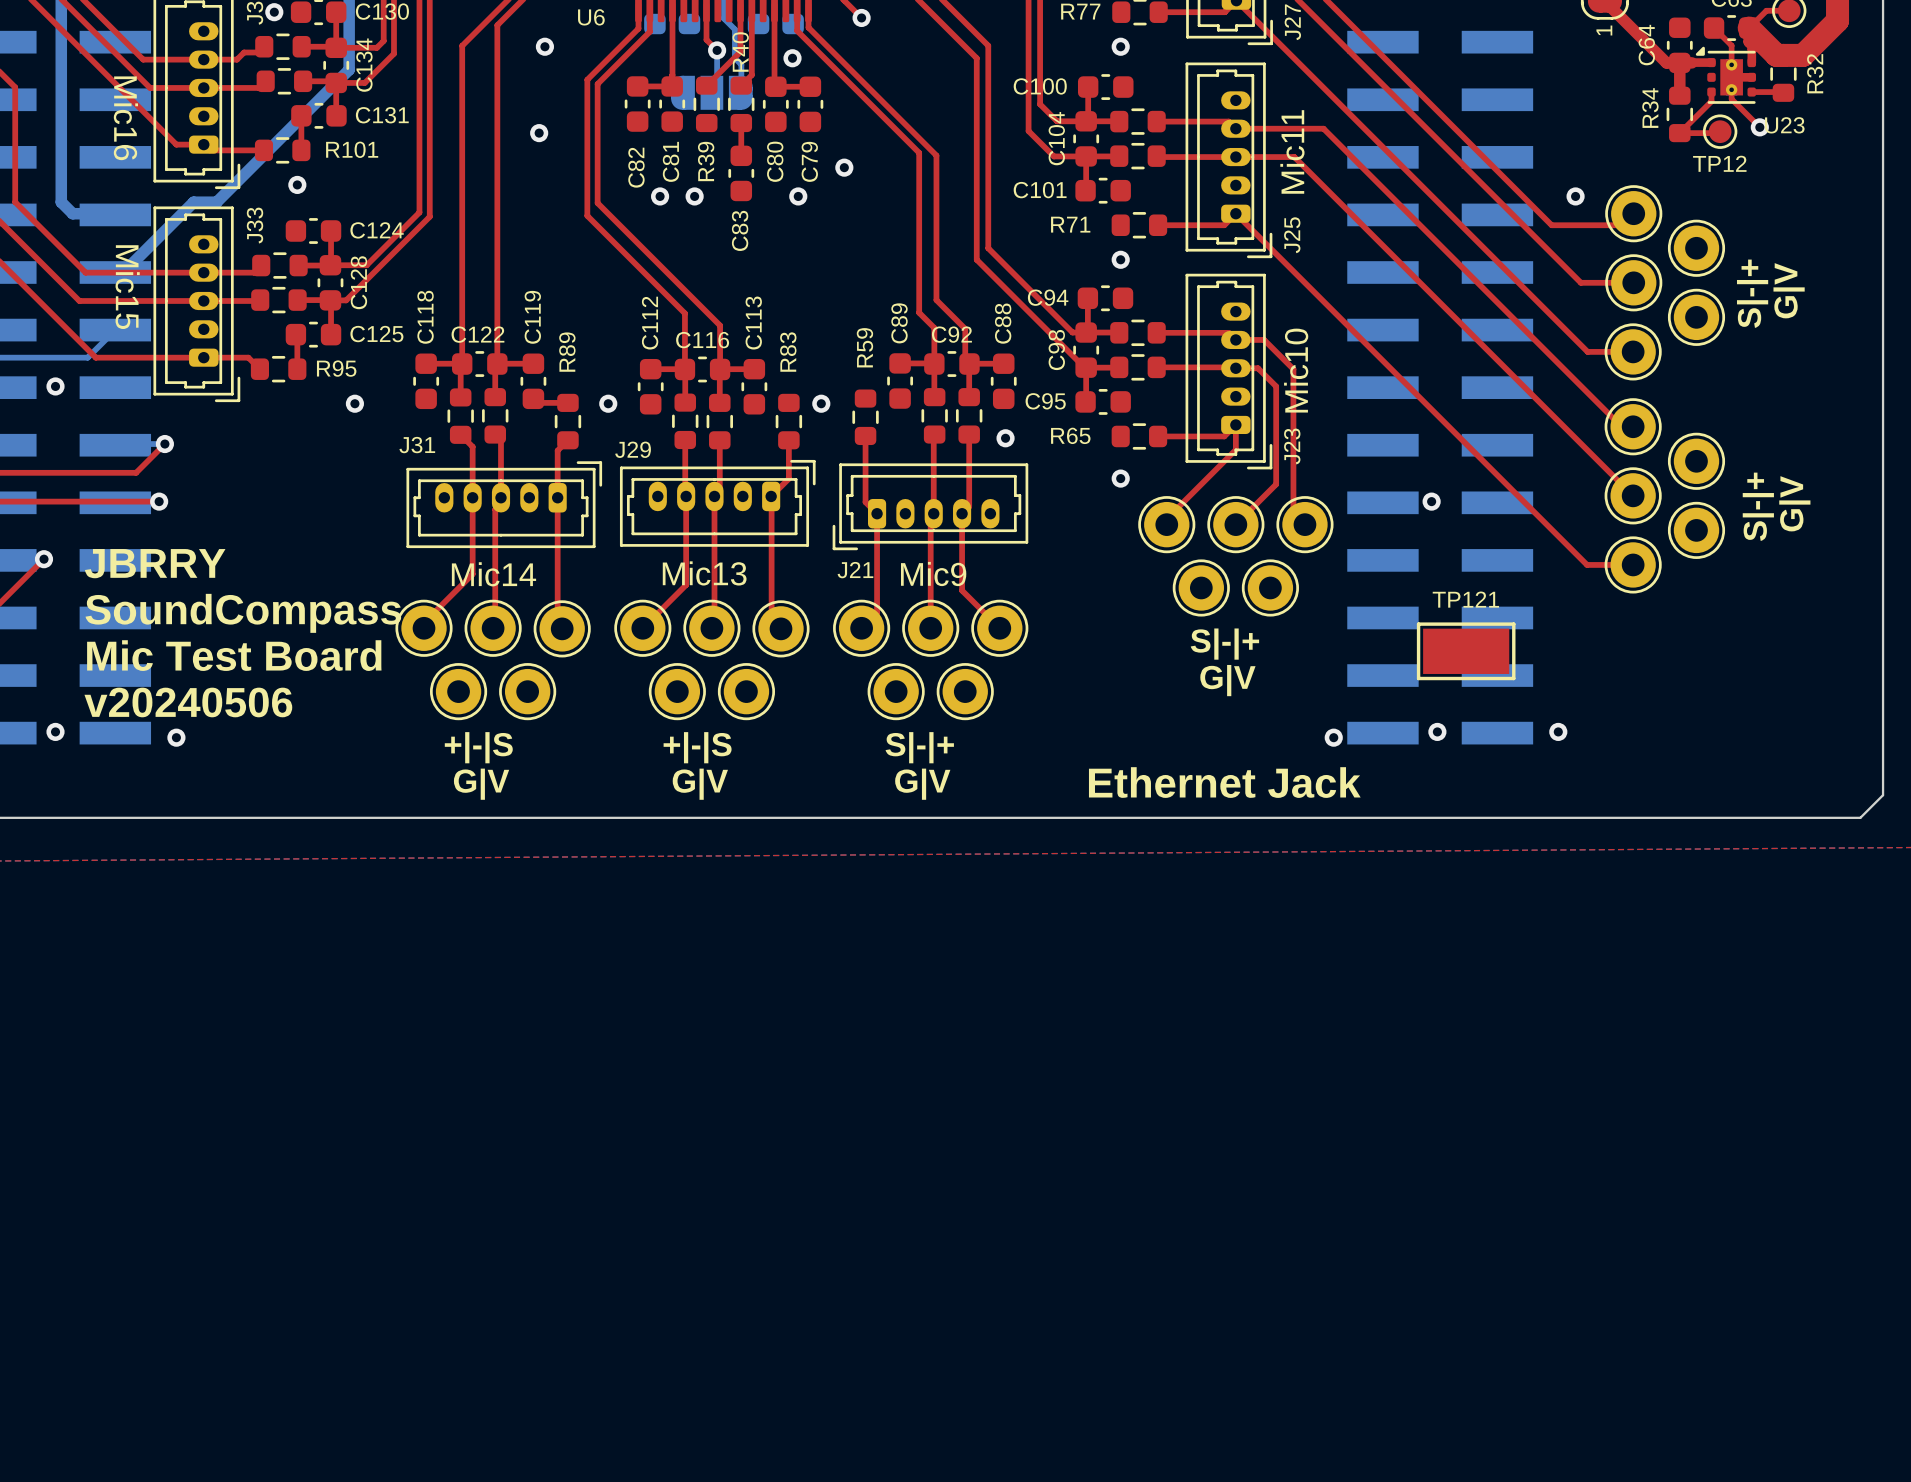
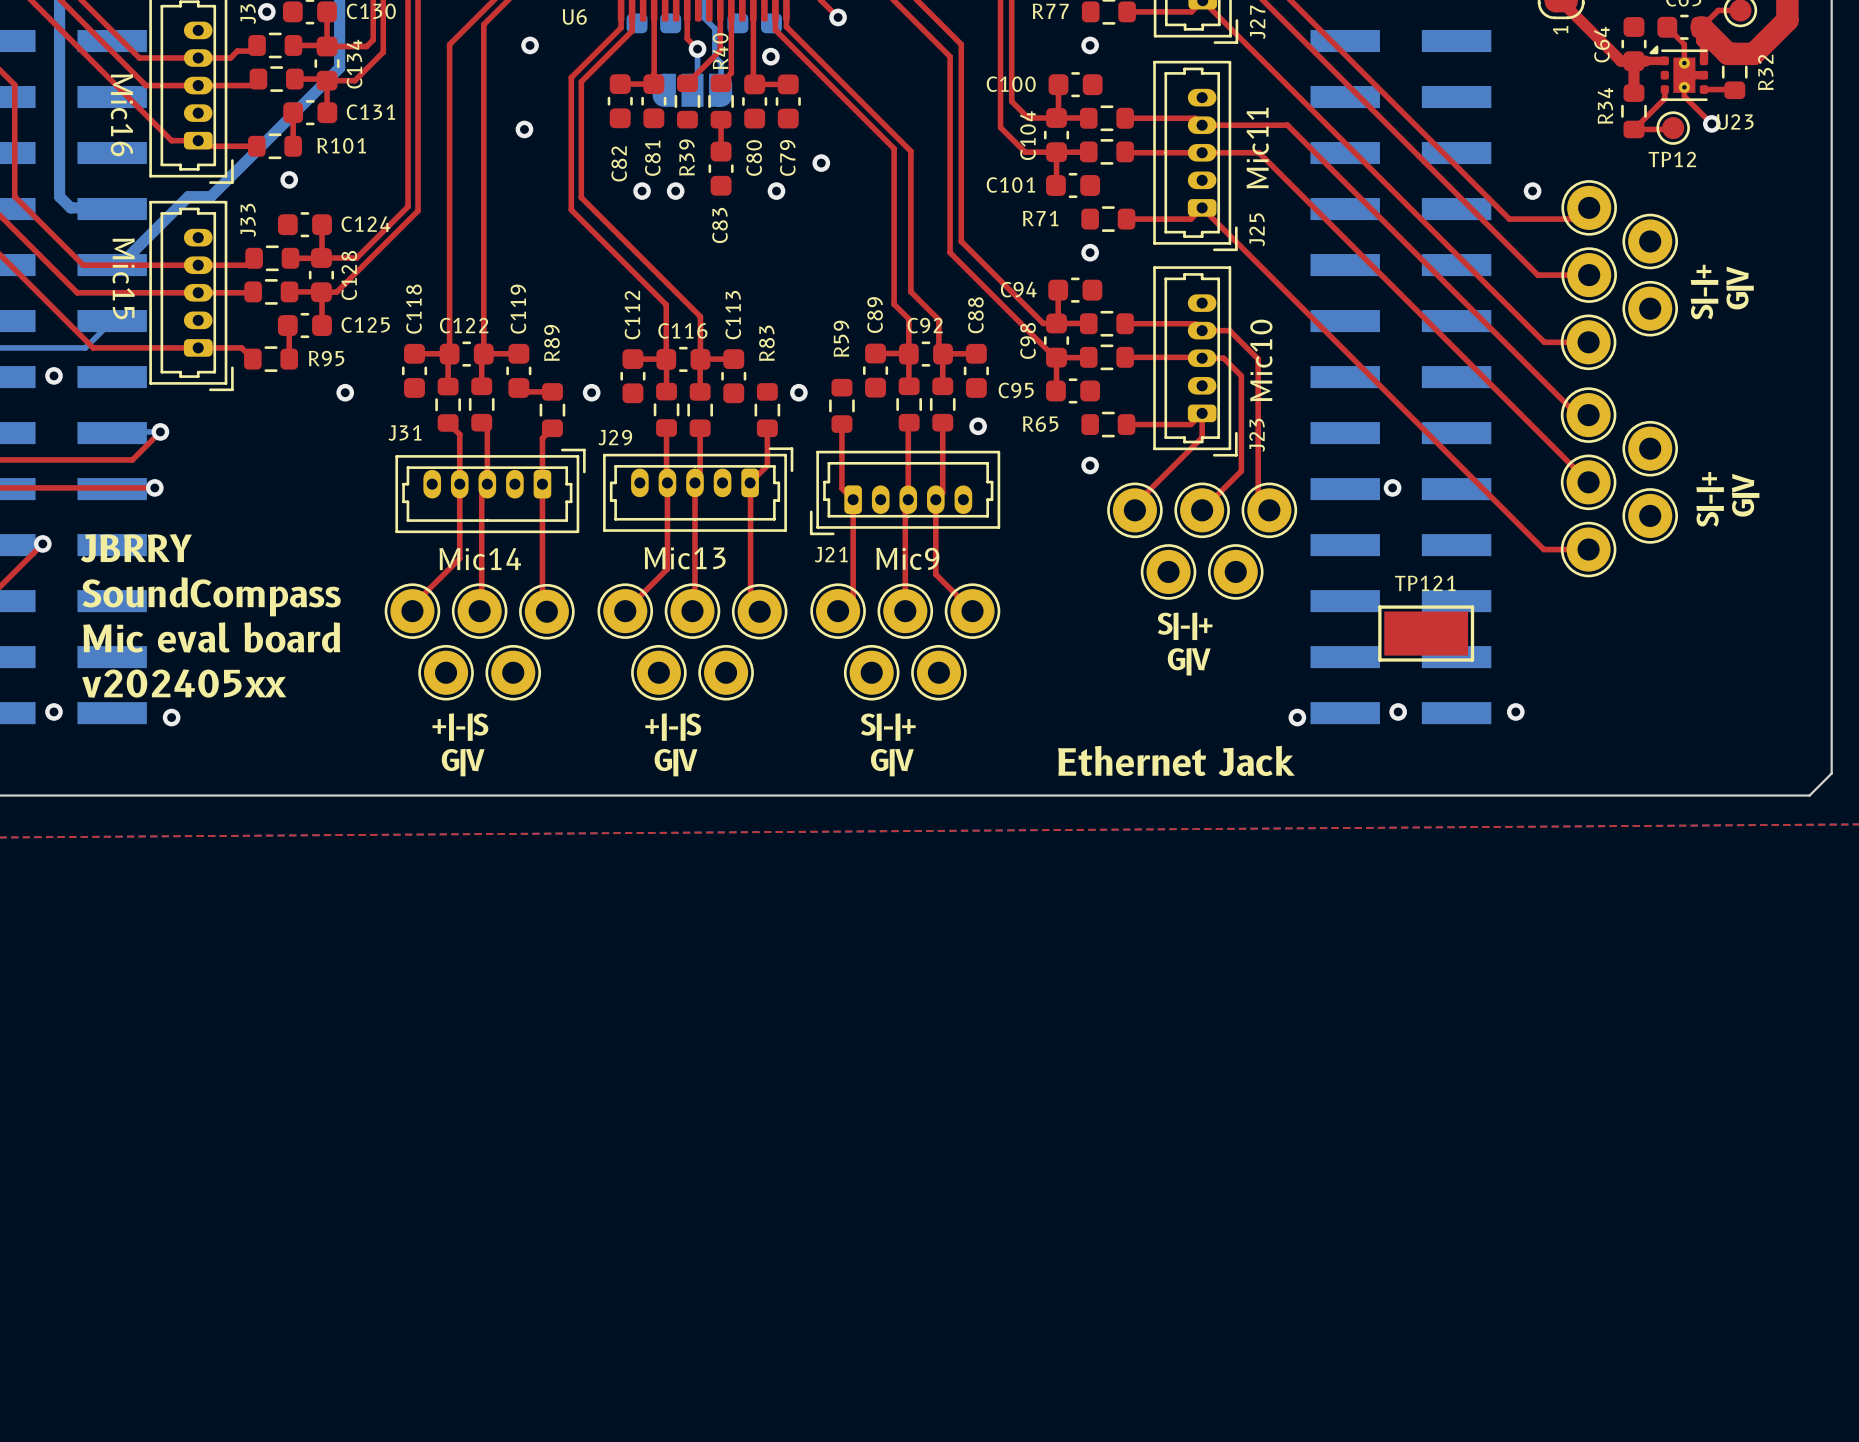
text: Mic Test Board (234, 655) -> Mic eval board (211, 637)
text: v20240506 (188, 702) -> v202405xx (184, 683)

